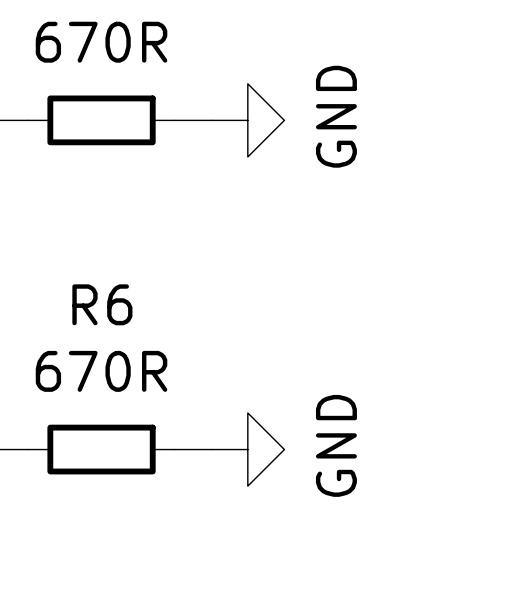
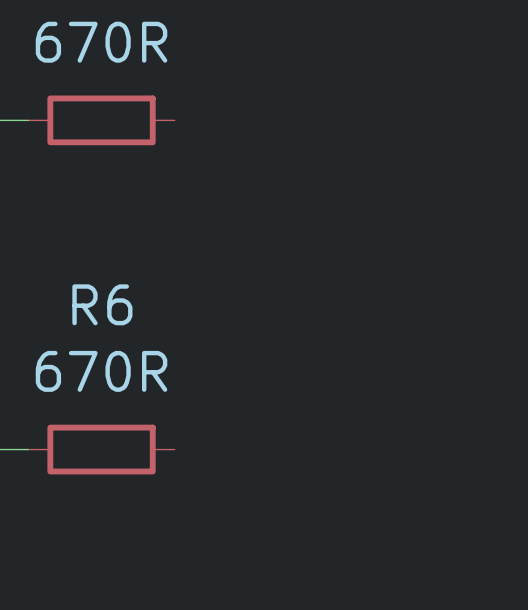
wire: (174, 120) (211, 120) -> none
power symbol: GND (247, 120) -> none
wire: (174, 449) (211, 449) -> none
power symbol: GND (247, 449) -> none

